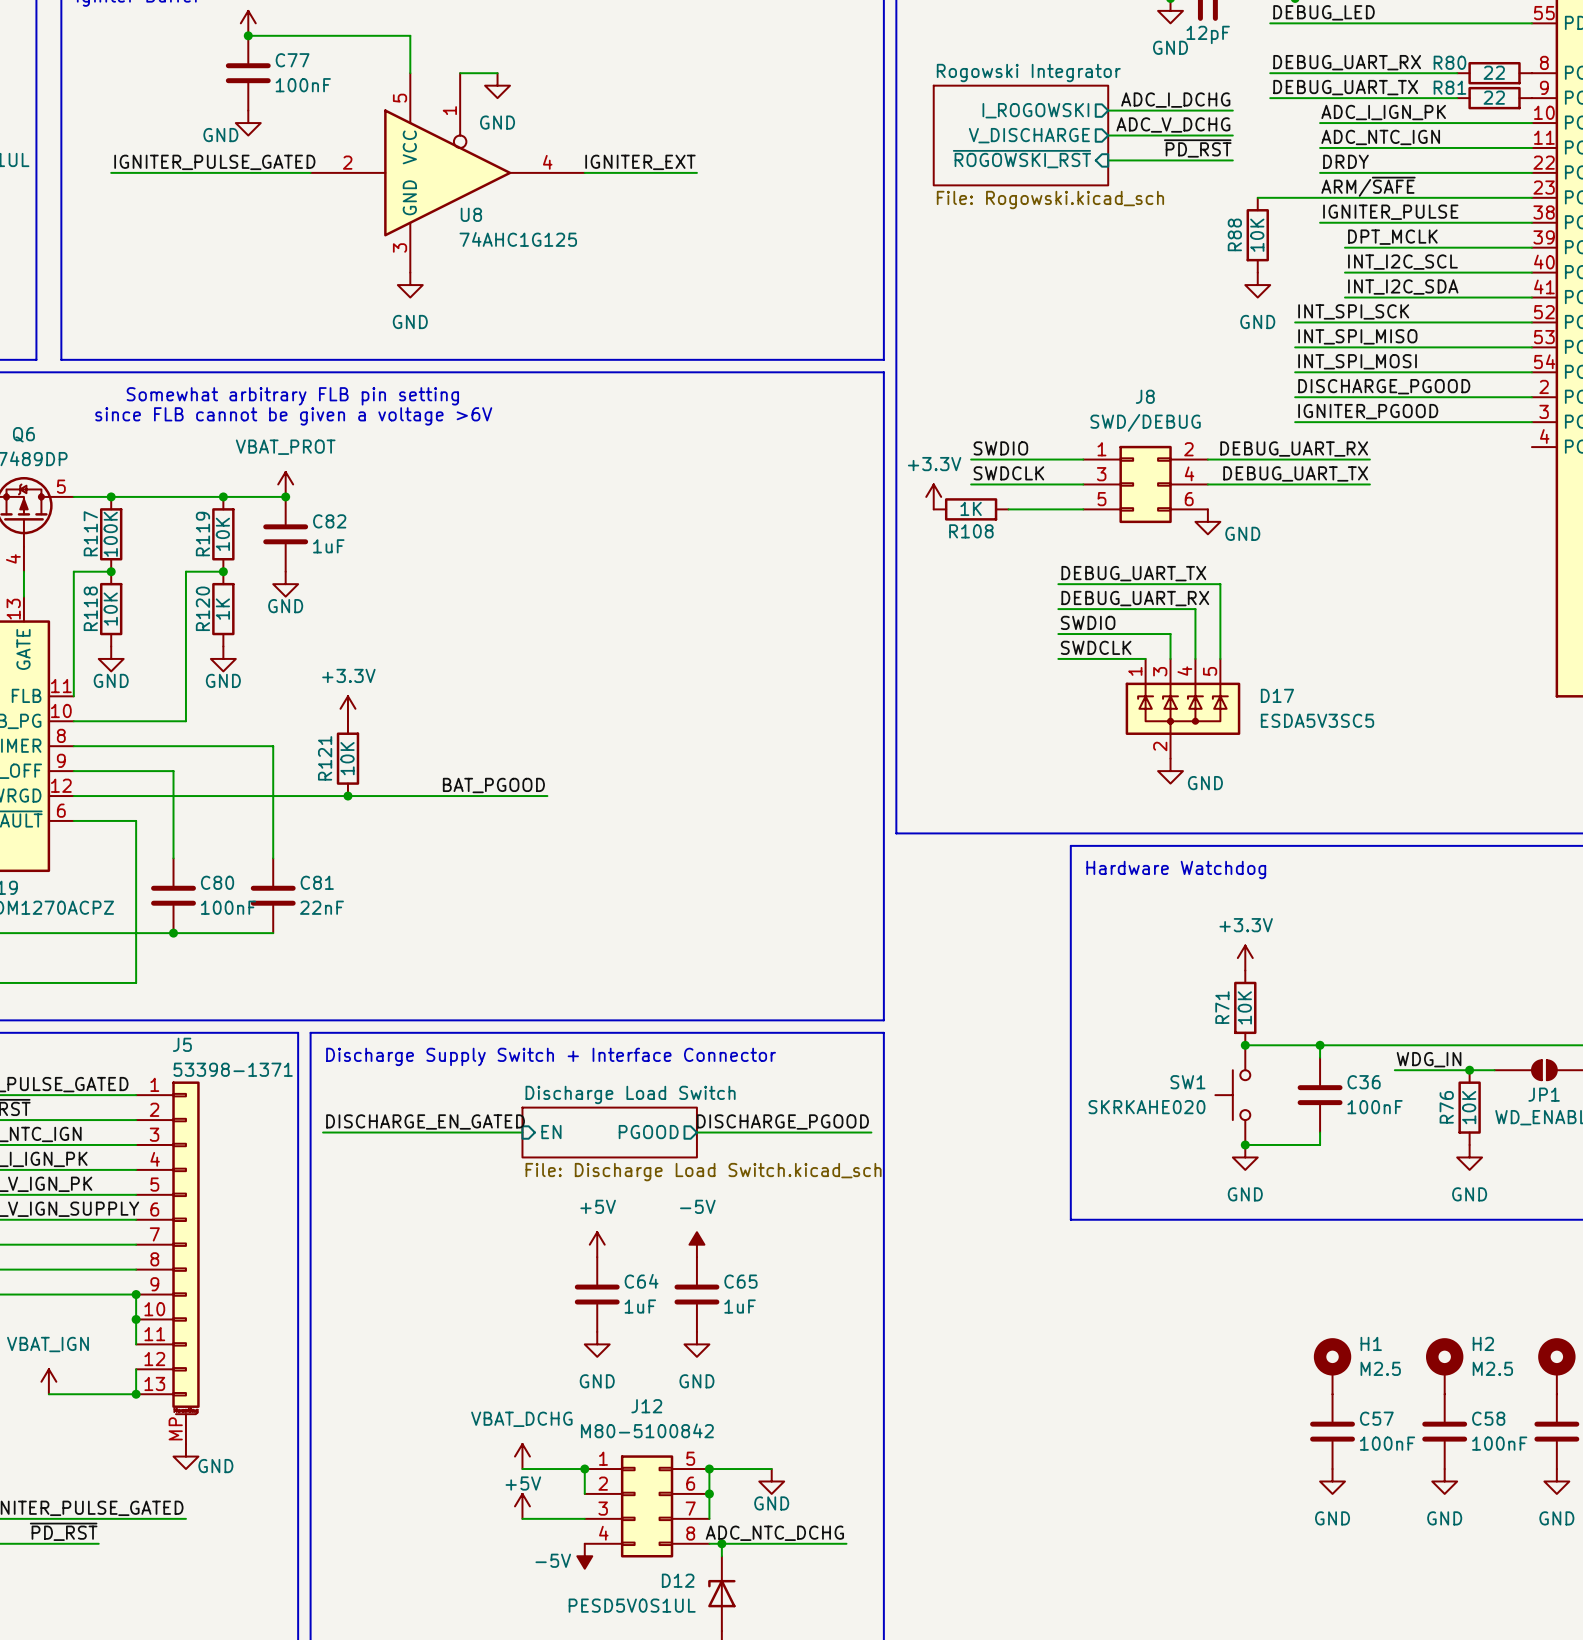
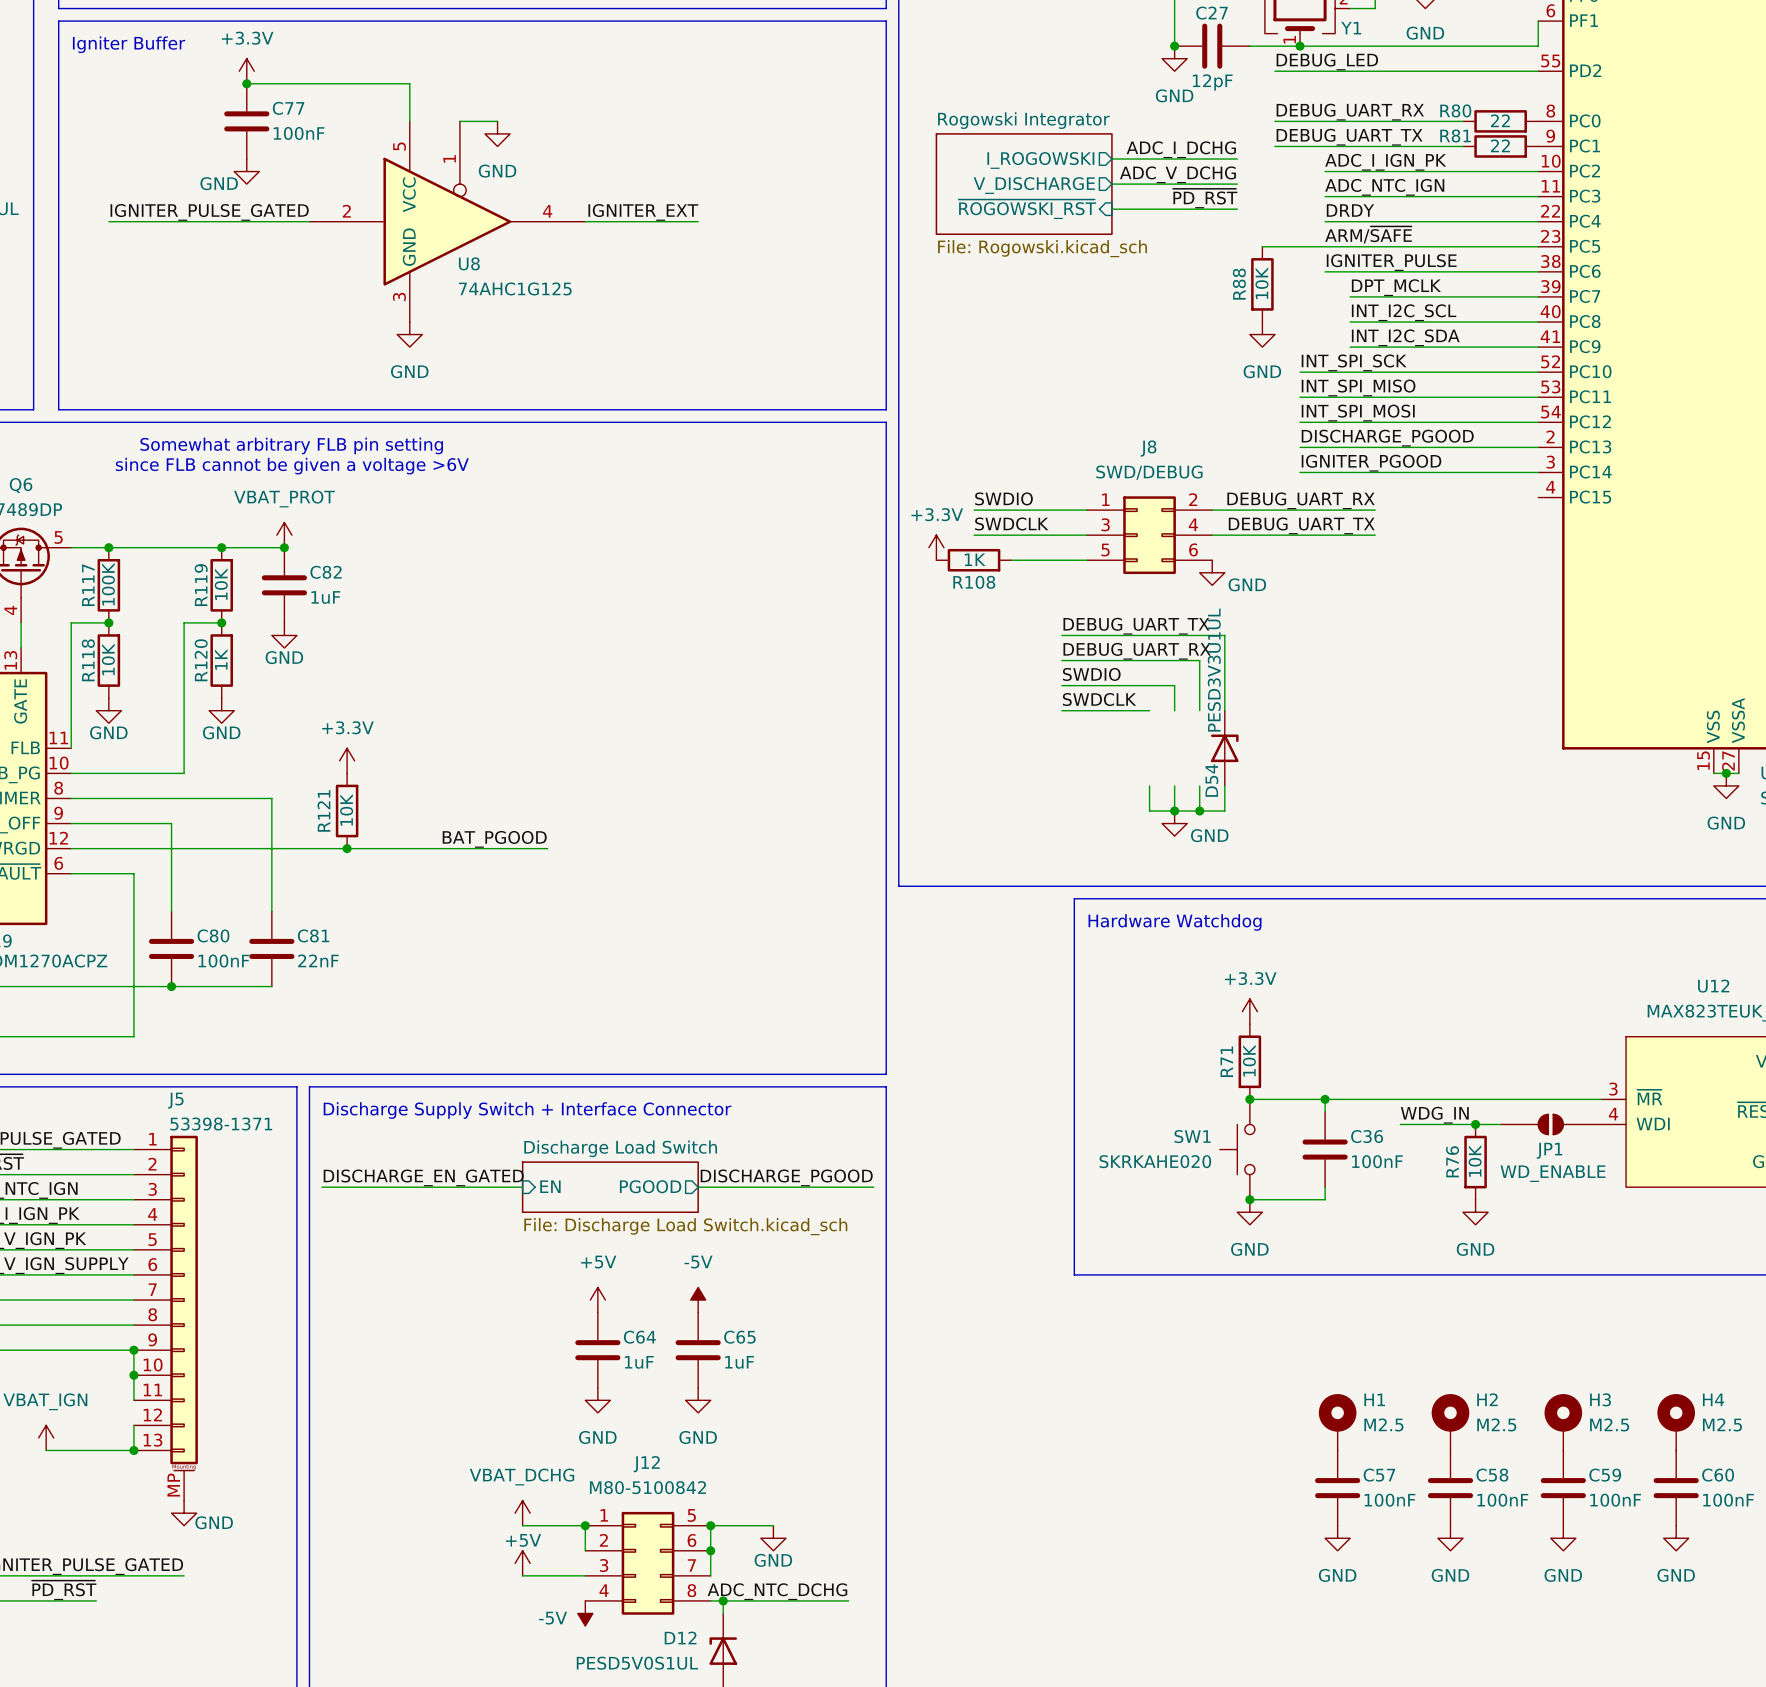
D54: none -> PESD3V3U1UL (1224, 748)
D17: ESDA5V3SC5 (1182, 708) -> none
wire: none -> (1149, 785) (1149, 811) (1224, 811) (1224, 785)
wire: none -> (1199, 785) (1199, 811)
junction: none -> (1174, 811)
junction: none -> (1199, 811)

